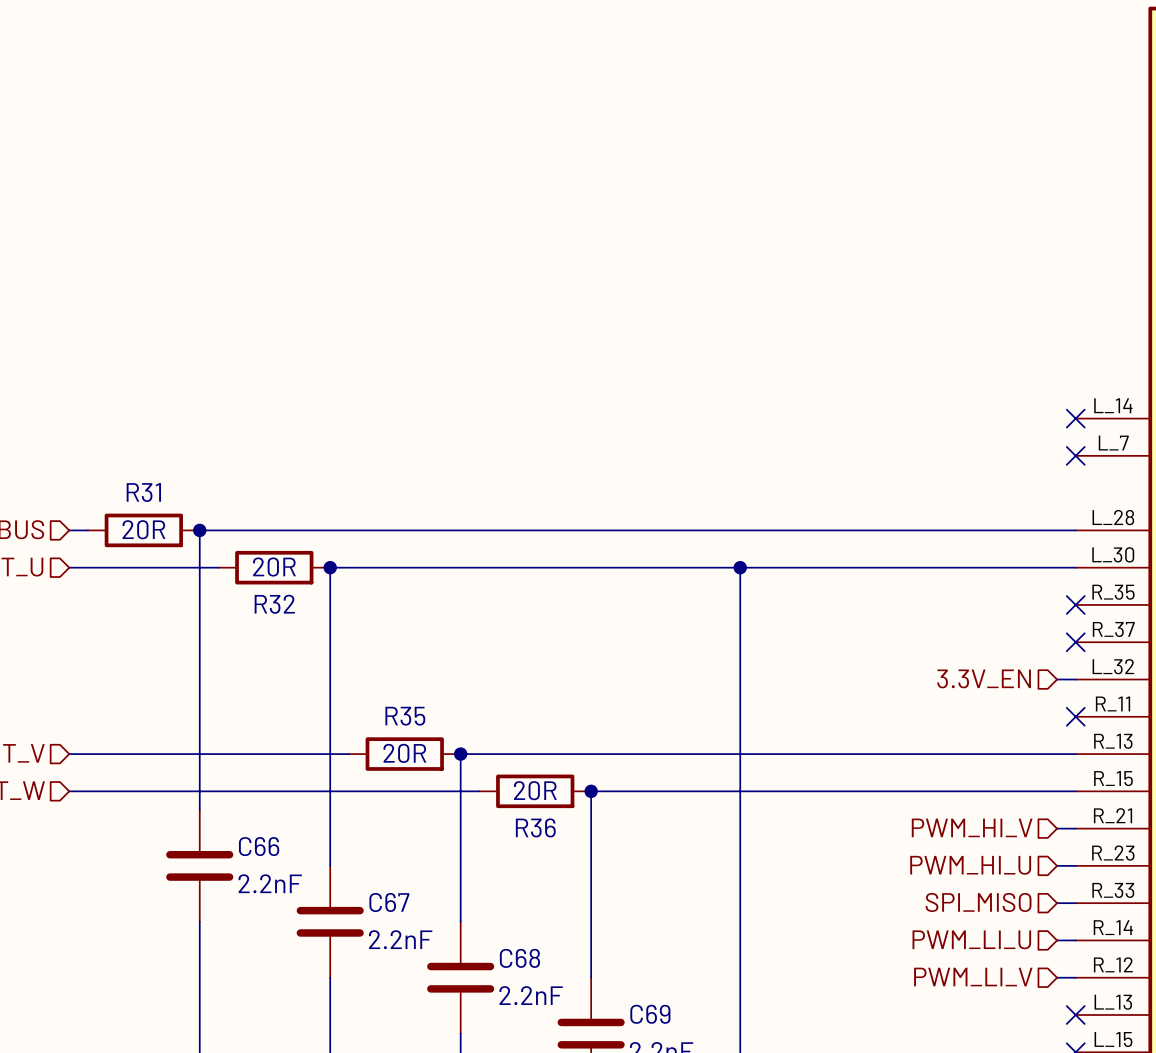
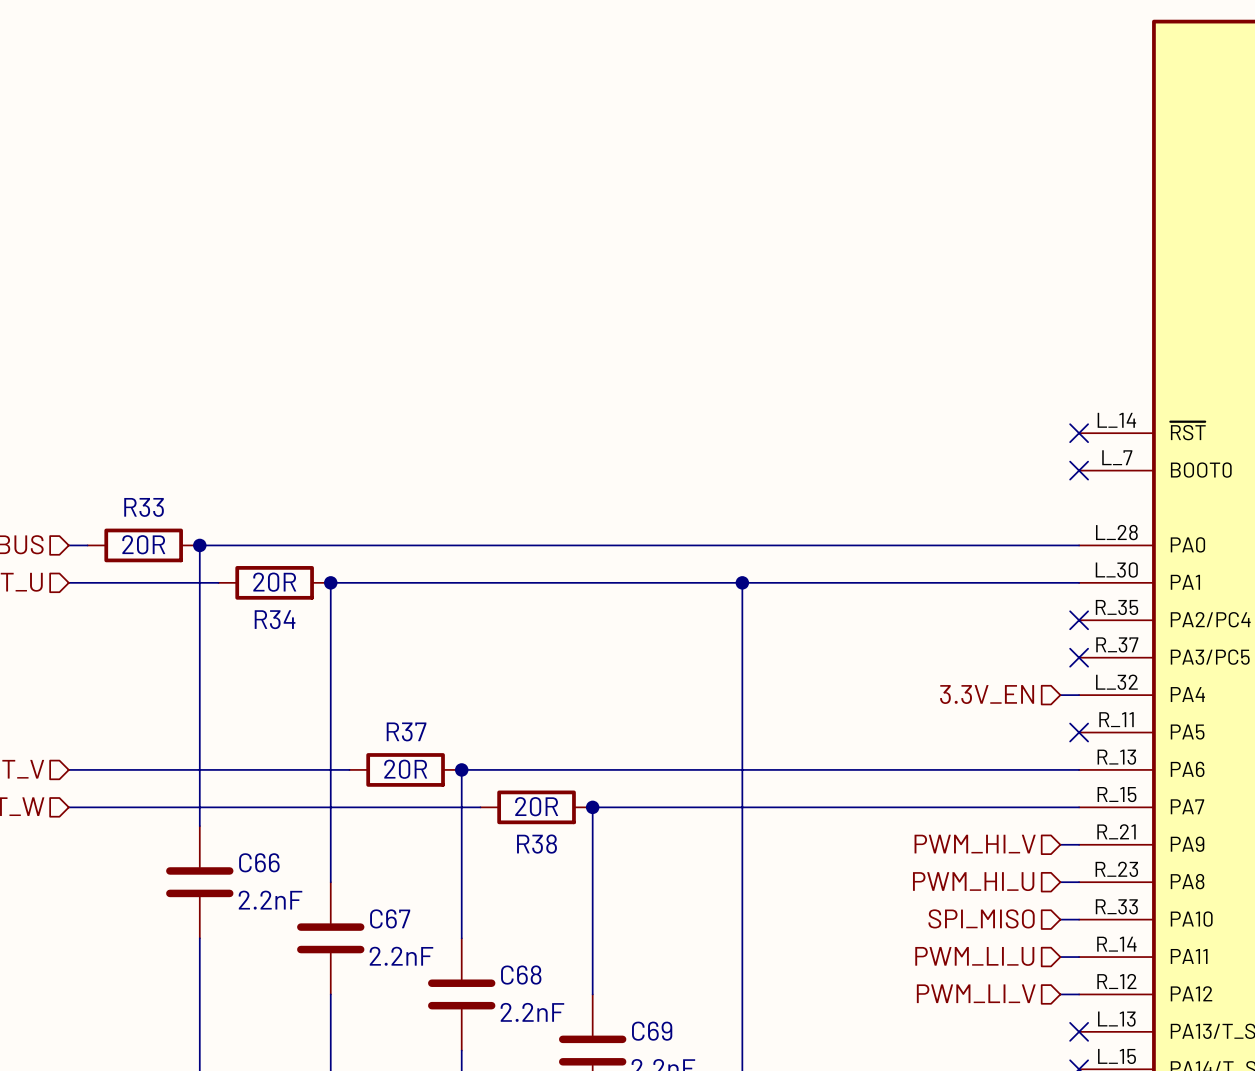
R31 name: R31 (143, 492) -> R33 (144, 507)
R32 name: R32 (274, 604) -> R34 (275, 619)
R35 name: R35 (405, 716) -> R37 (406, 731)
R36 name: R36 (535, 827) -> R38 (536, 844)

